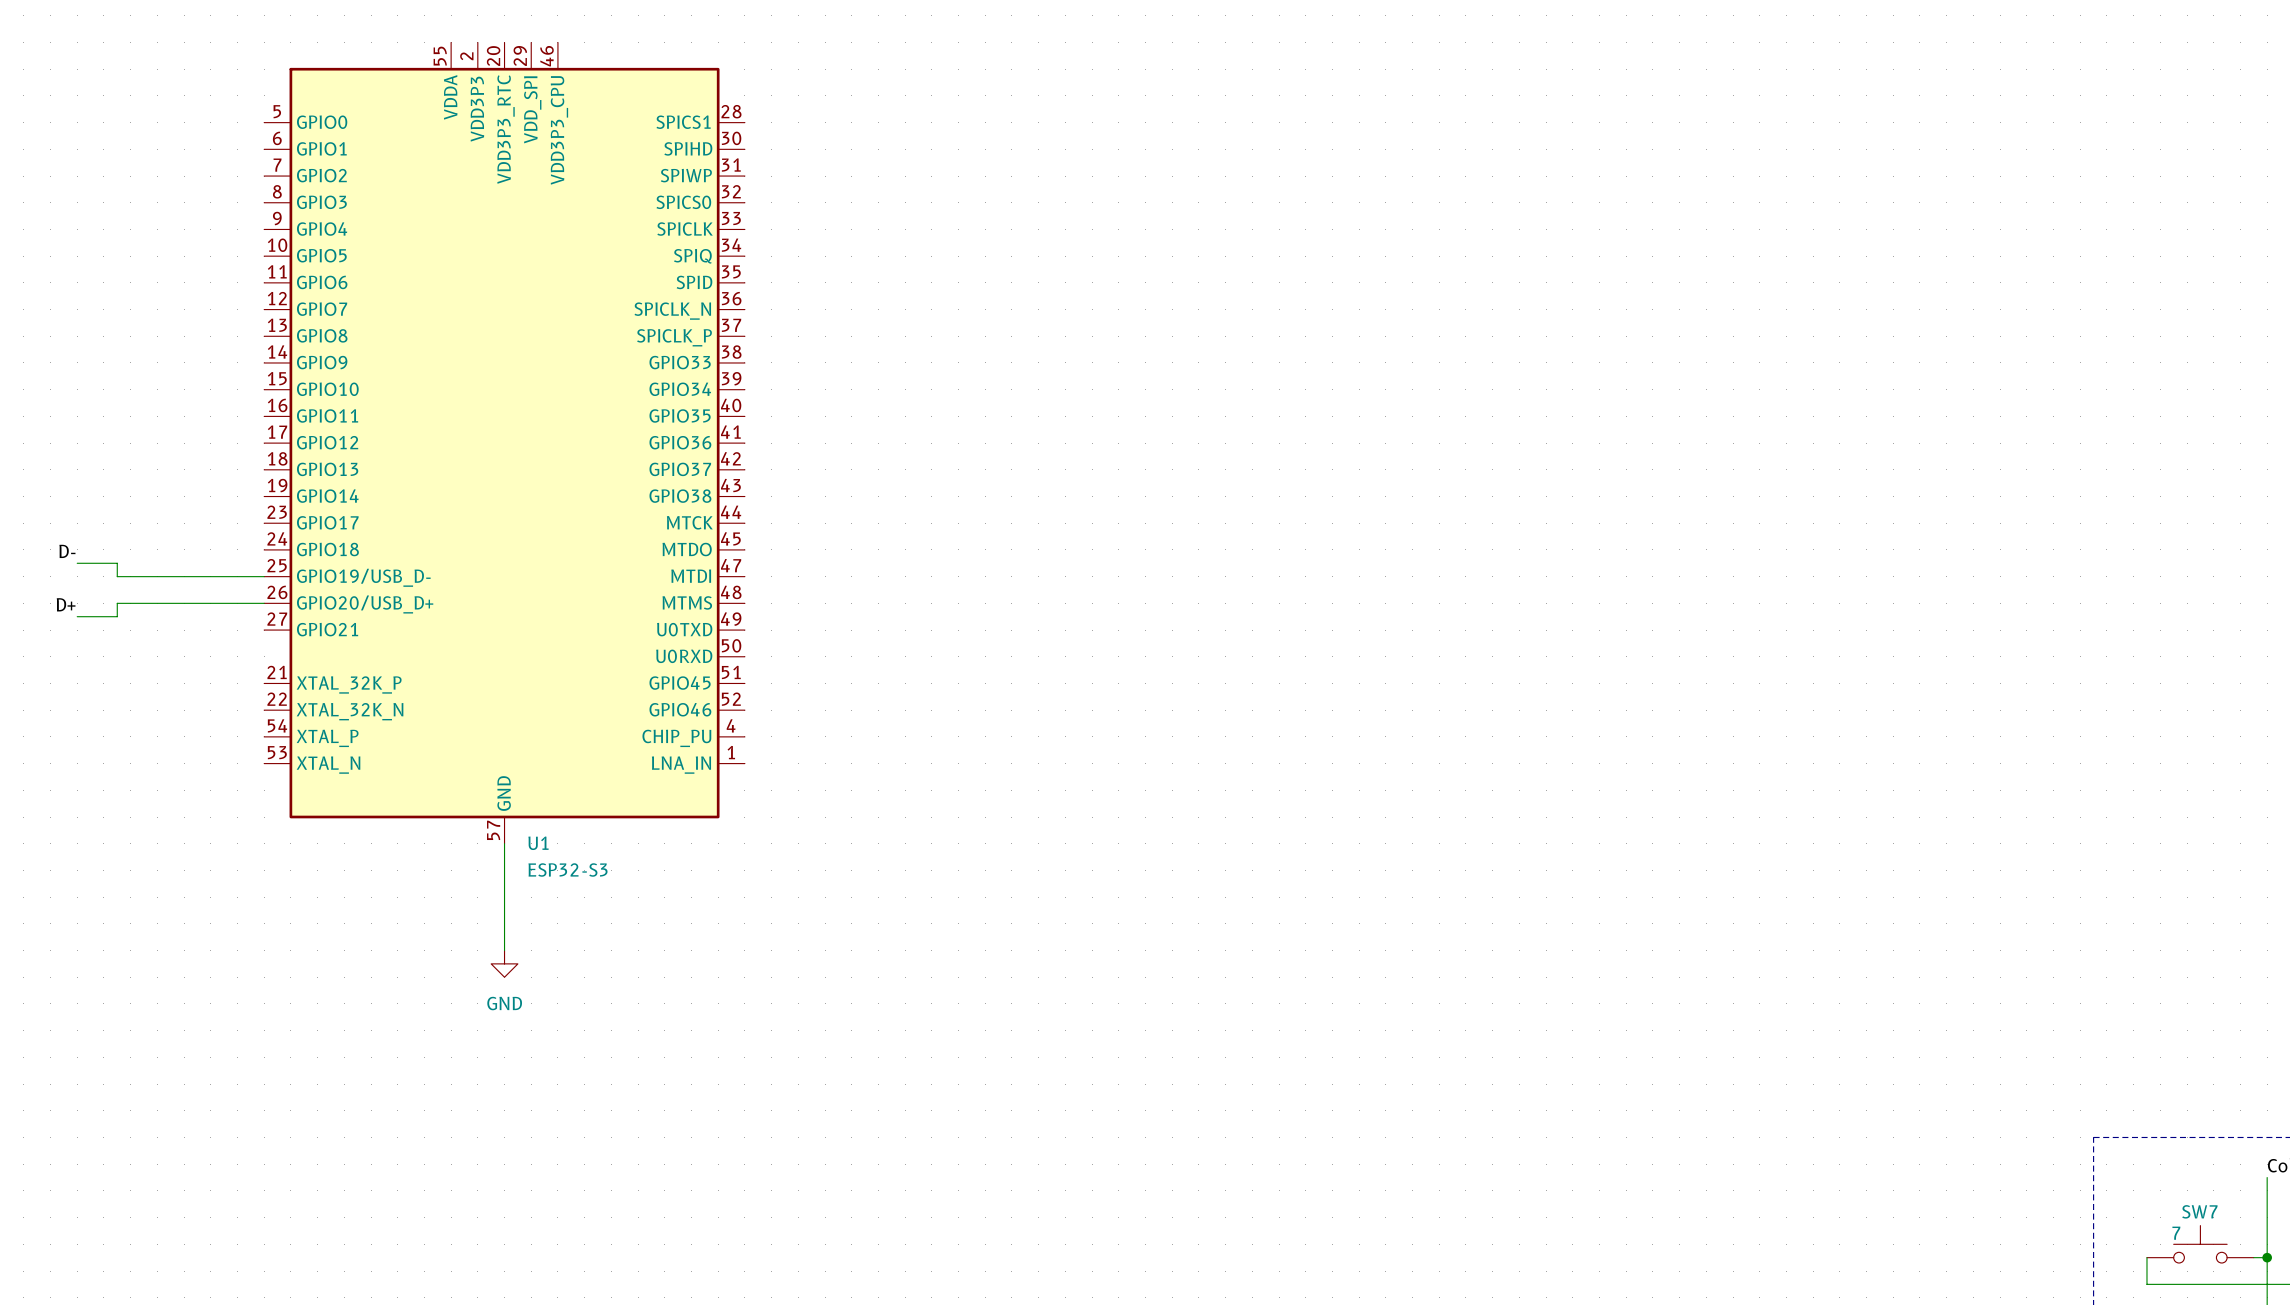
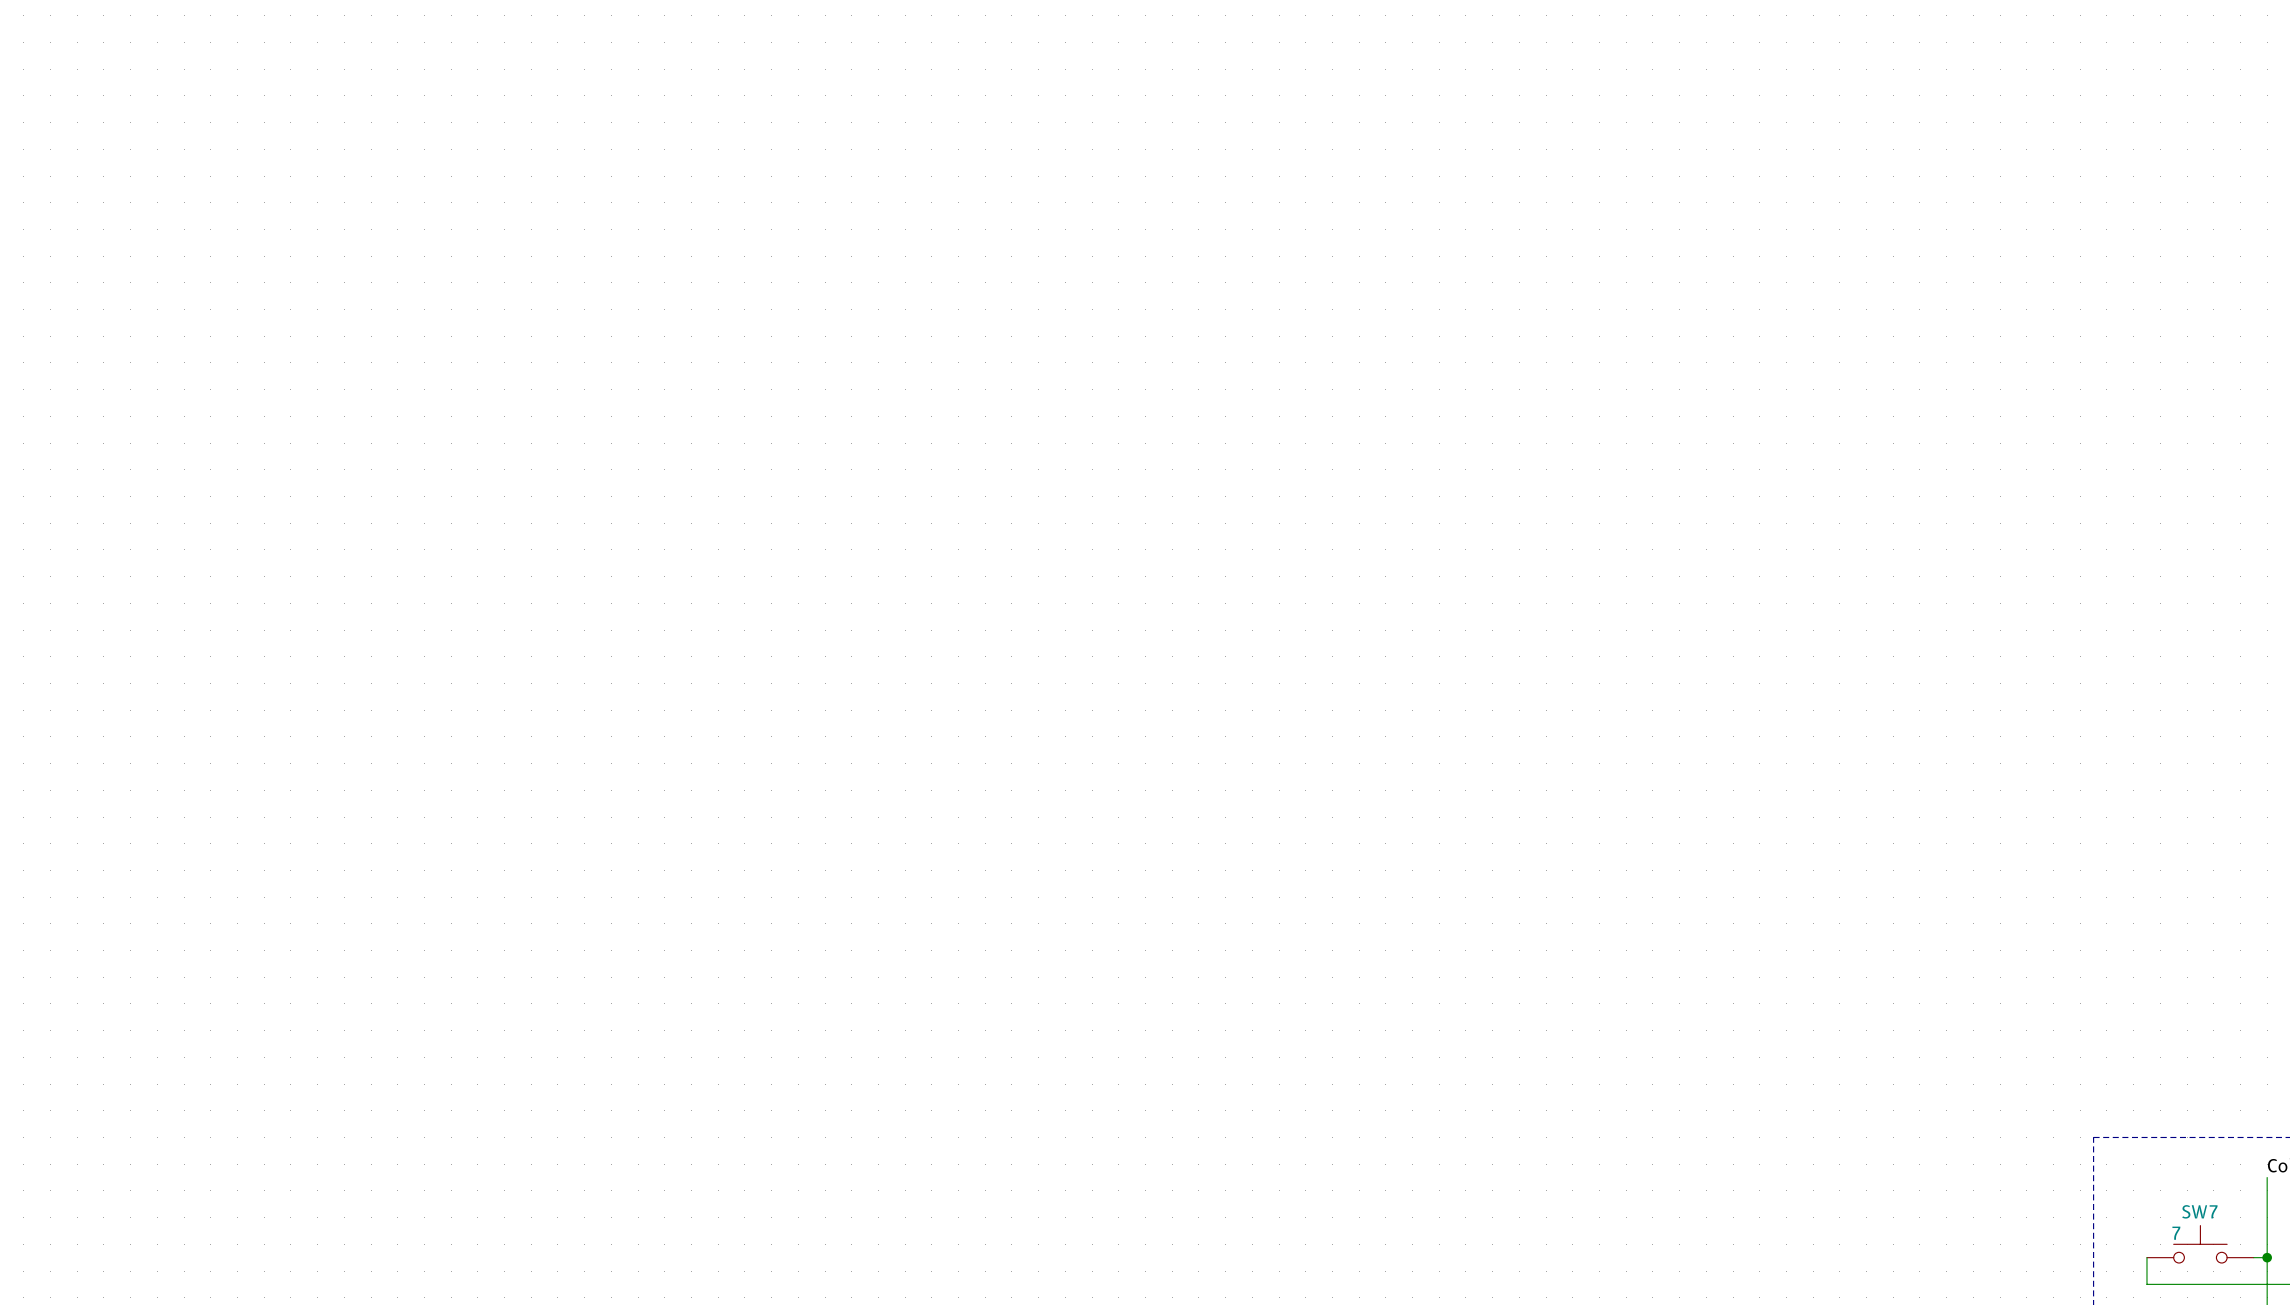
U1: ESP32-S3 (504, 443) -> none
label: D- (67, 551) -> none
wire: (77, 563) (117, 563) (117, 576) (264, 576) -> none
wire: (264, 603) (117, 603) (117, 616) (77, 616) -> none
label: D+ (66, 604) -> none
wire: (504, 843) (504, 950) -> none
power symbol: GND (504, 963) -> none

